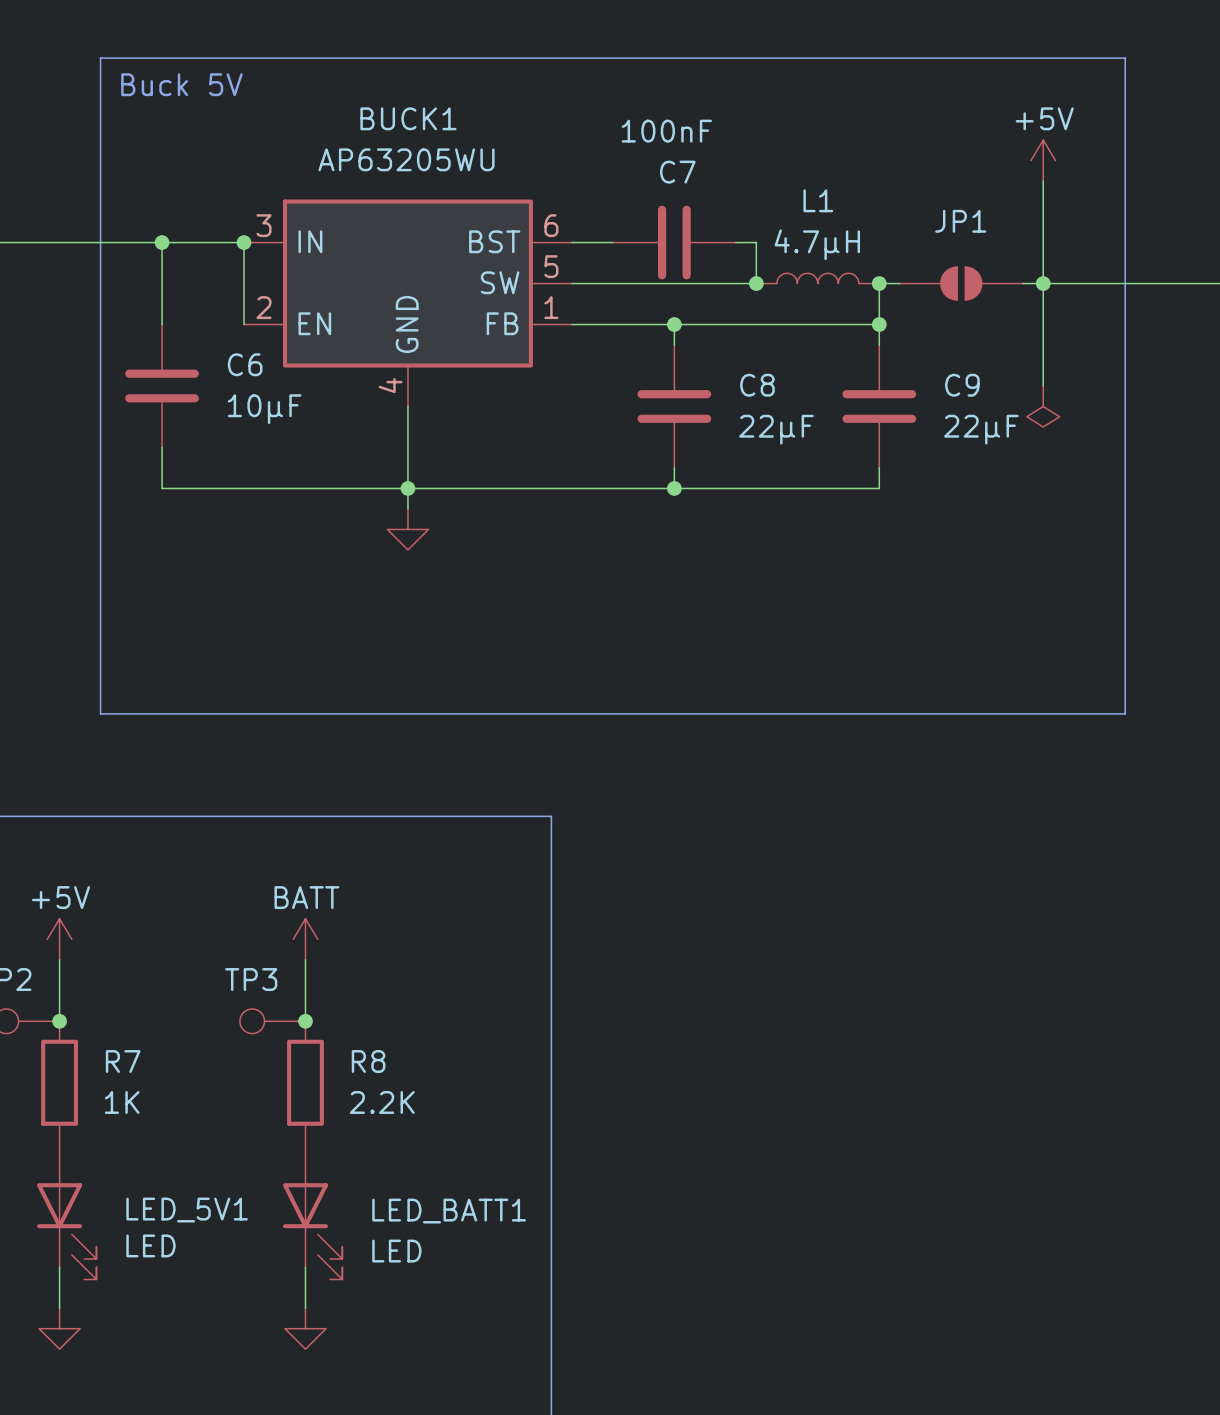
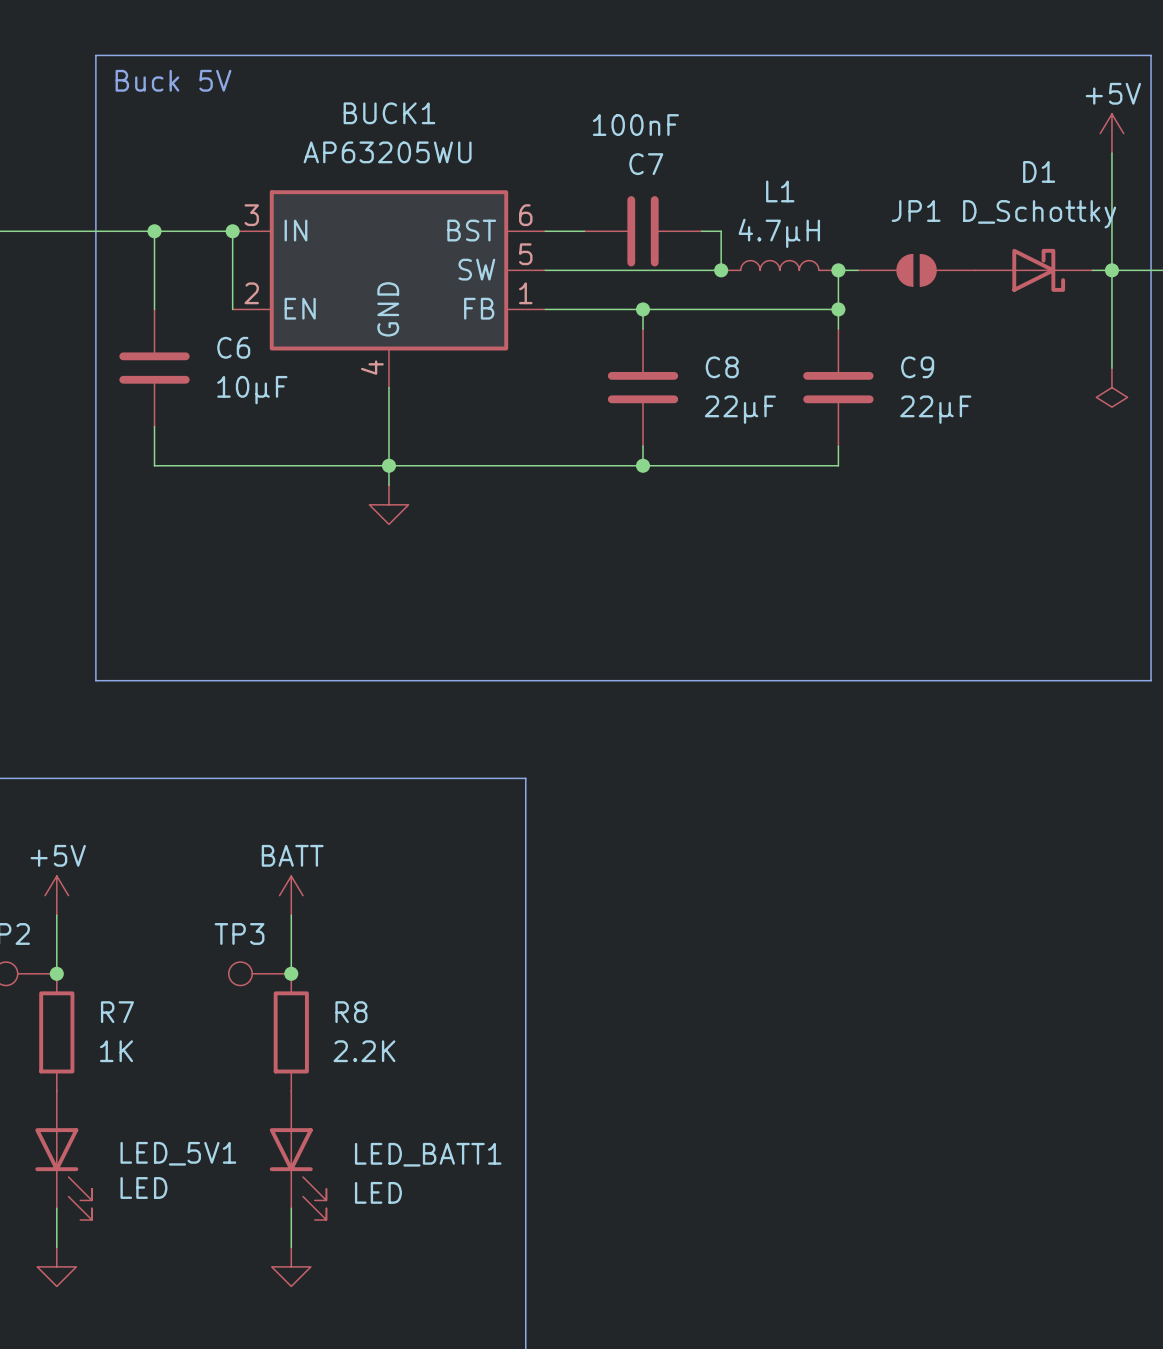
line: (1125, 58) (1125, 713) -> (1072, 55) (1151, 55) (1151, 680) (1072, 680)
power symbol position: +5V (1043, 160) -> +5V (1111, 133)
wire: none -> (1111, 153) (1111, 368)
wire: (1043, 181) (1043, 386) -> none
junction: (1043, 283) -> none
D1: none -> D_Schottky (1033, 270)
junction: none -> (1111, 270)
power symbol position: (1043, 406) -> (1111, 387)

